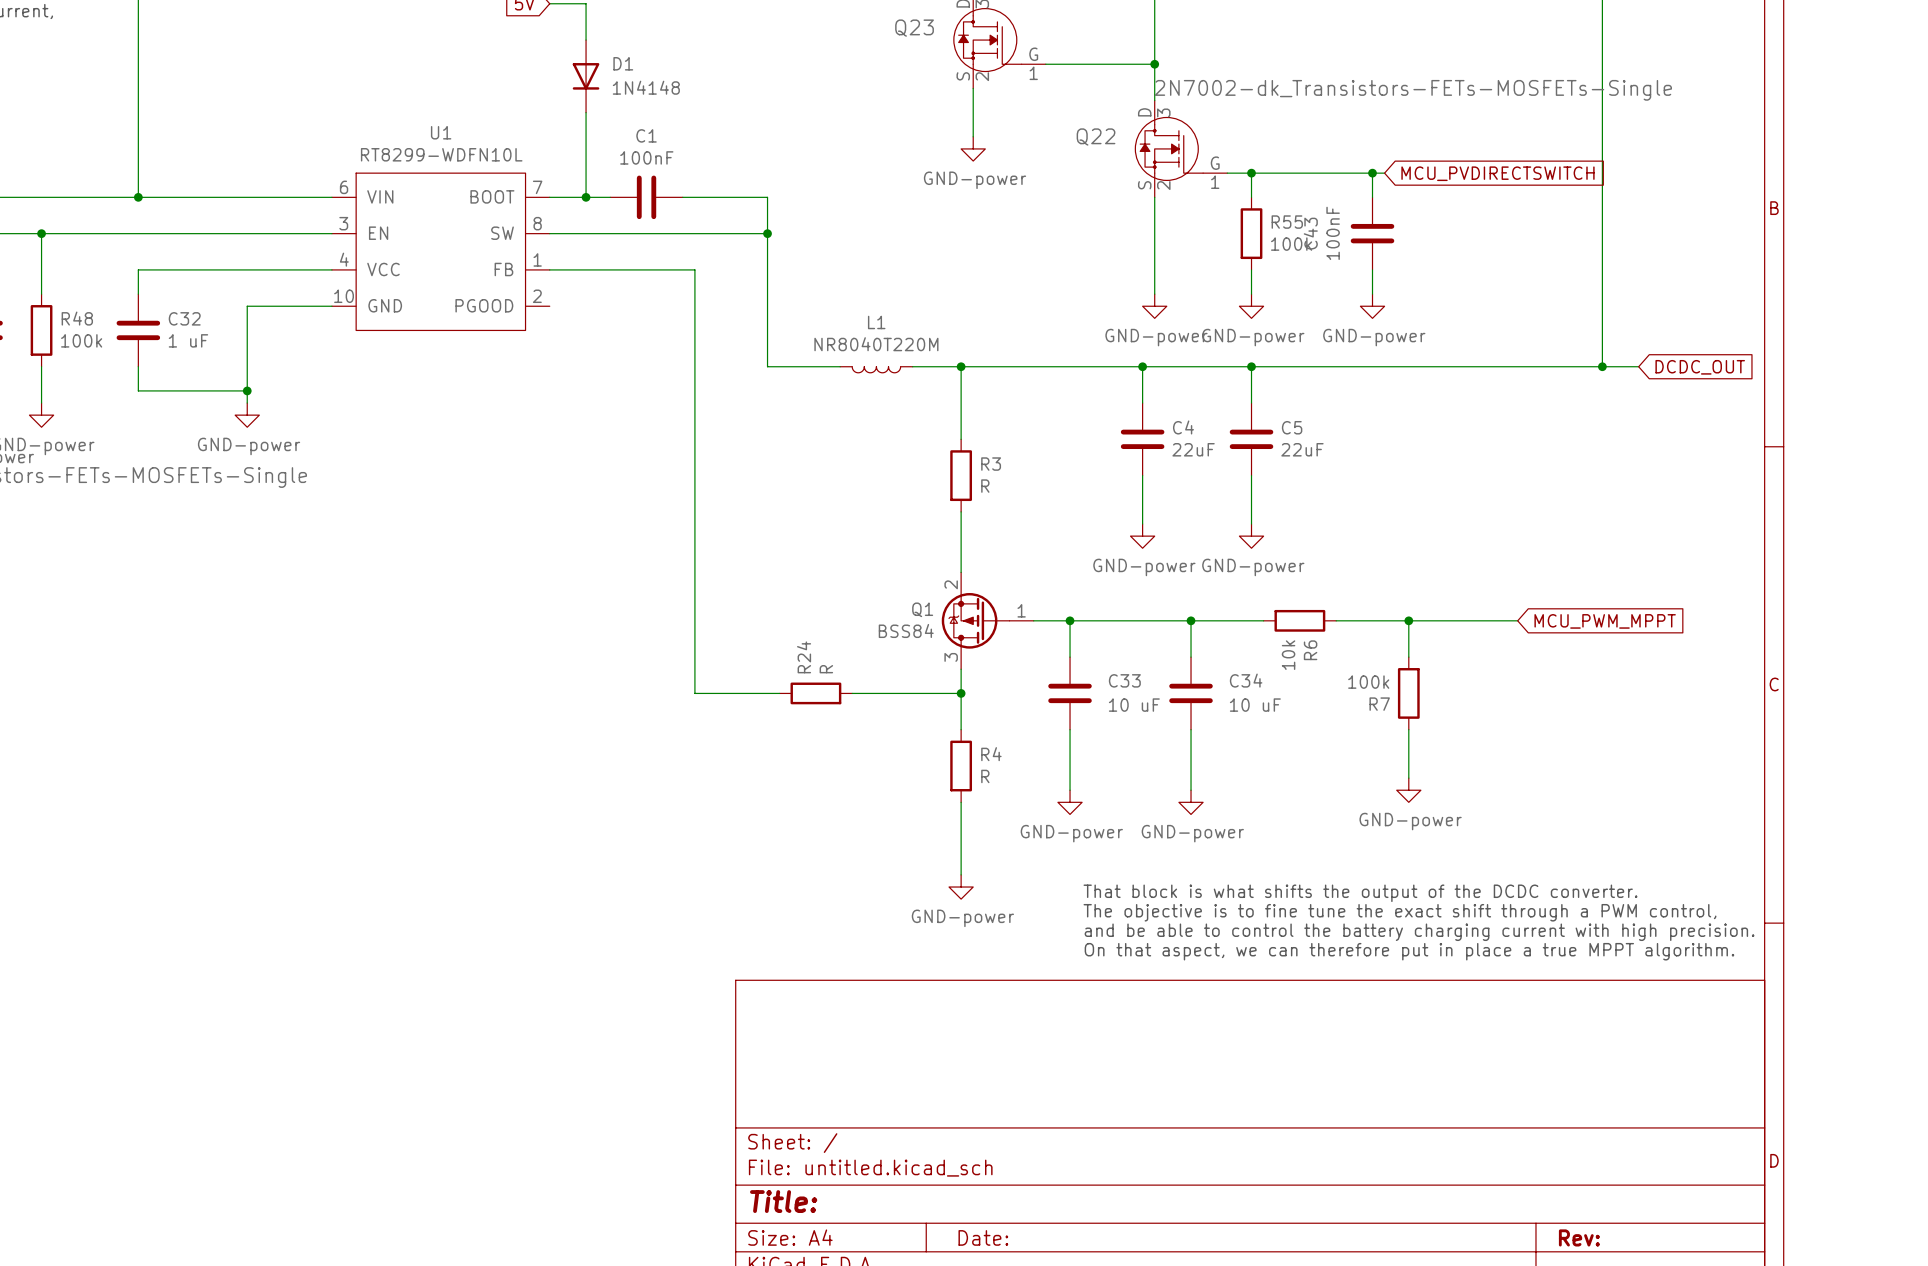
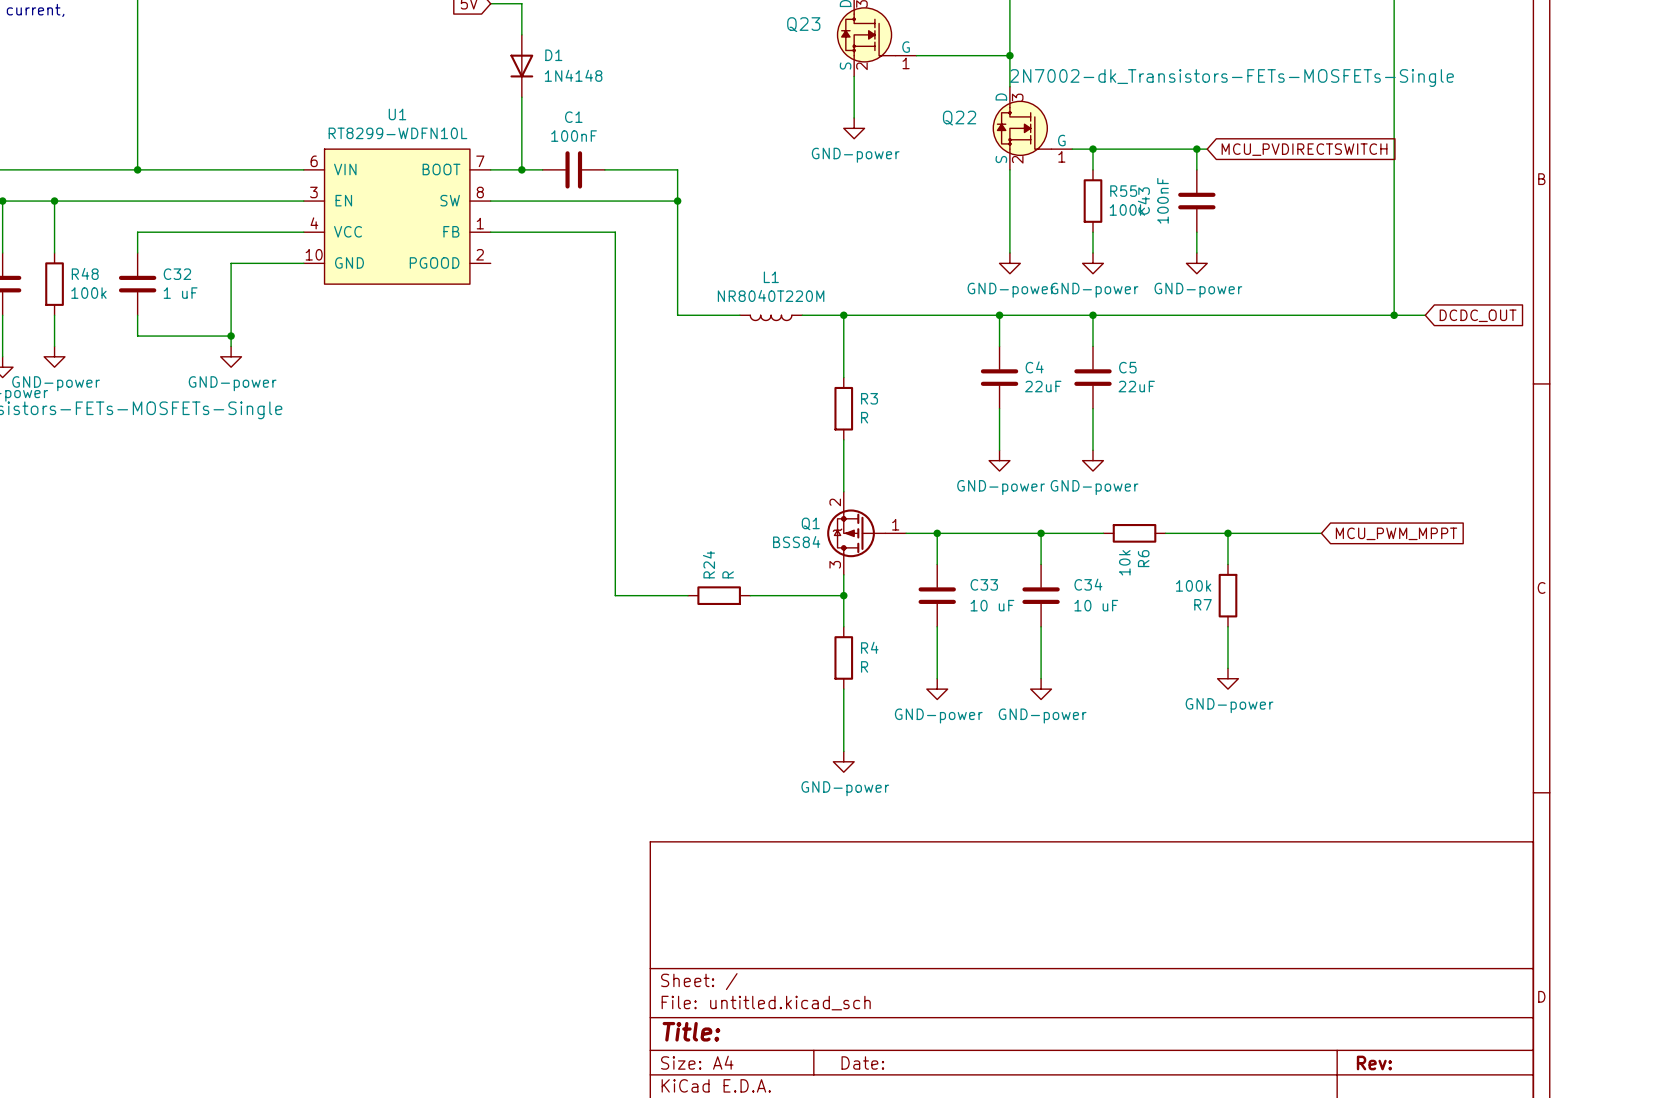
text: That block is what shifts the output of the DCDC converter. (1360, 893) -> none
text: The objective is to fine tune the exact shift through a PWM control, (1399, 912) -> none
text: and be able to control the battery charging current with high precision. (1419, 932) -> none
text: On that aspect, we can therefore put in place a true MPPT algorithm. (1409, 951) -> none

